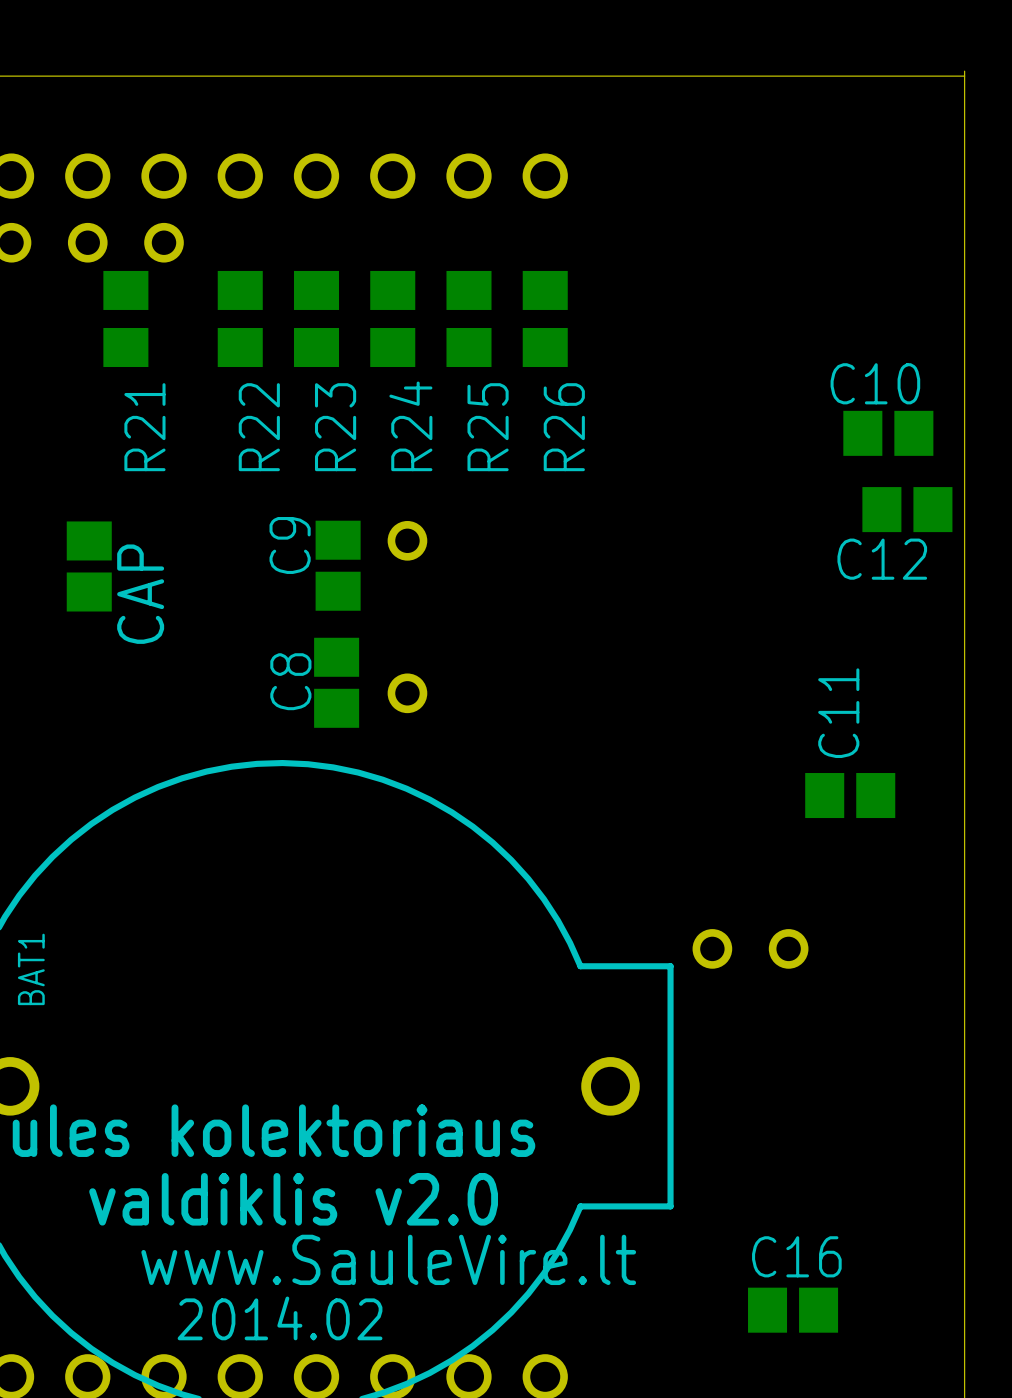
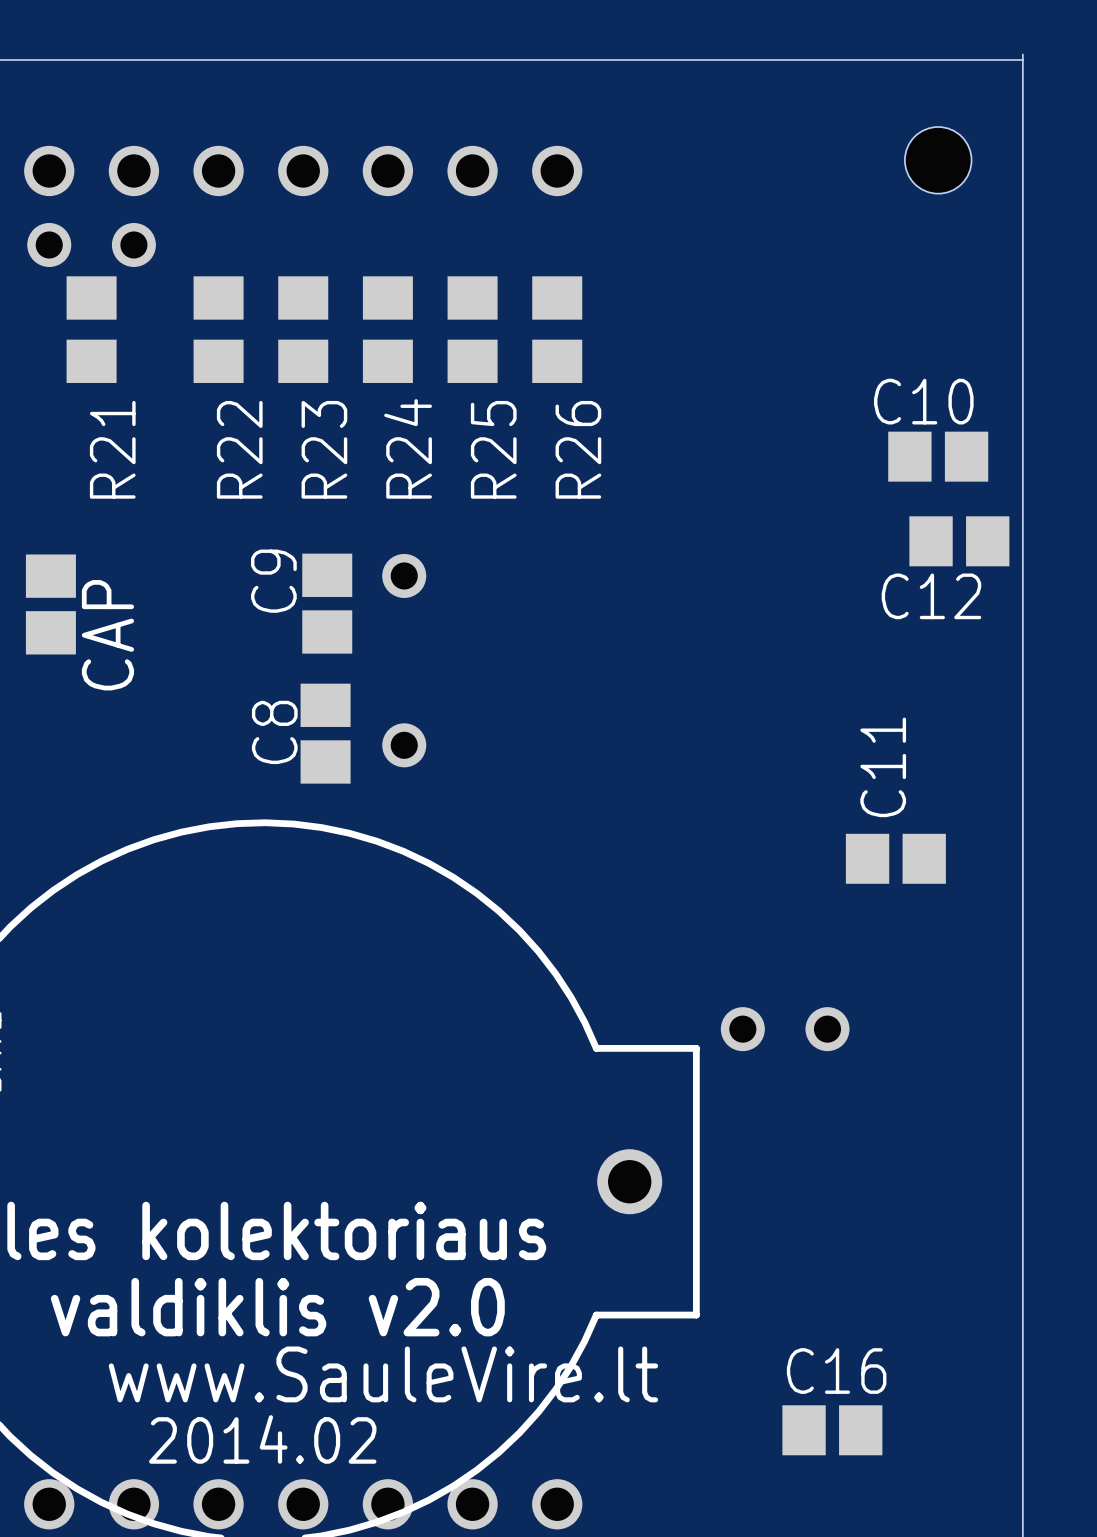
hole: none -> (938, 160)

